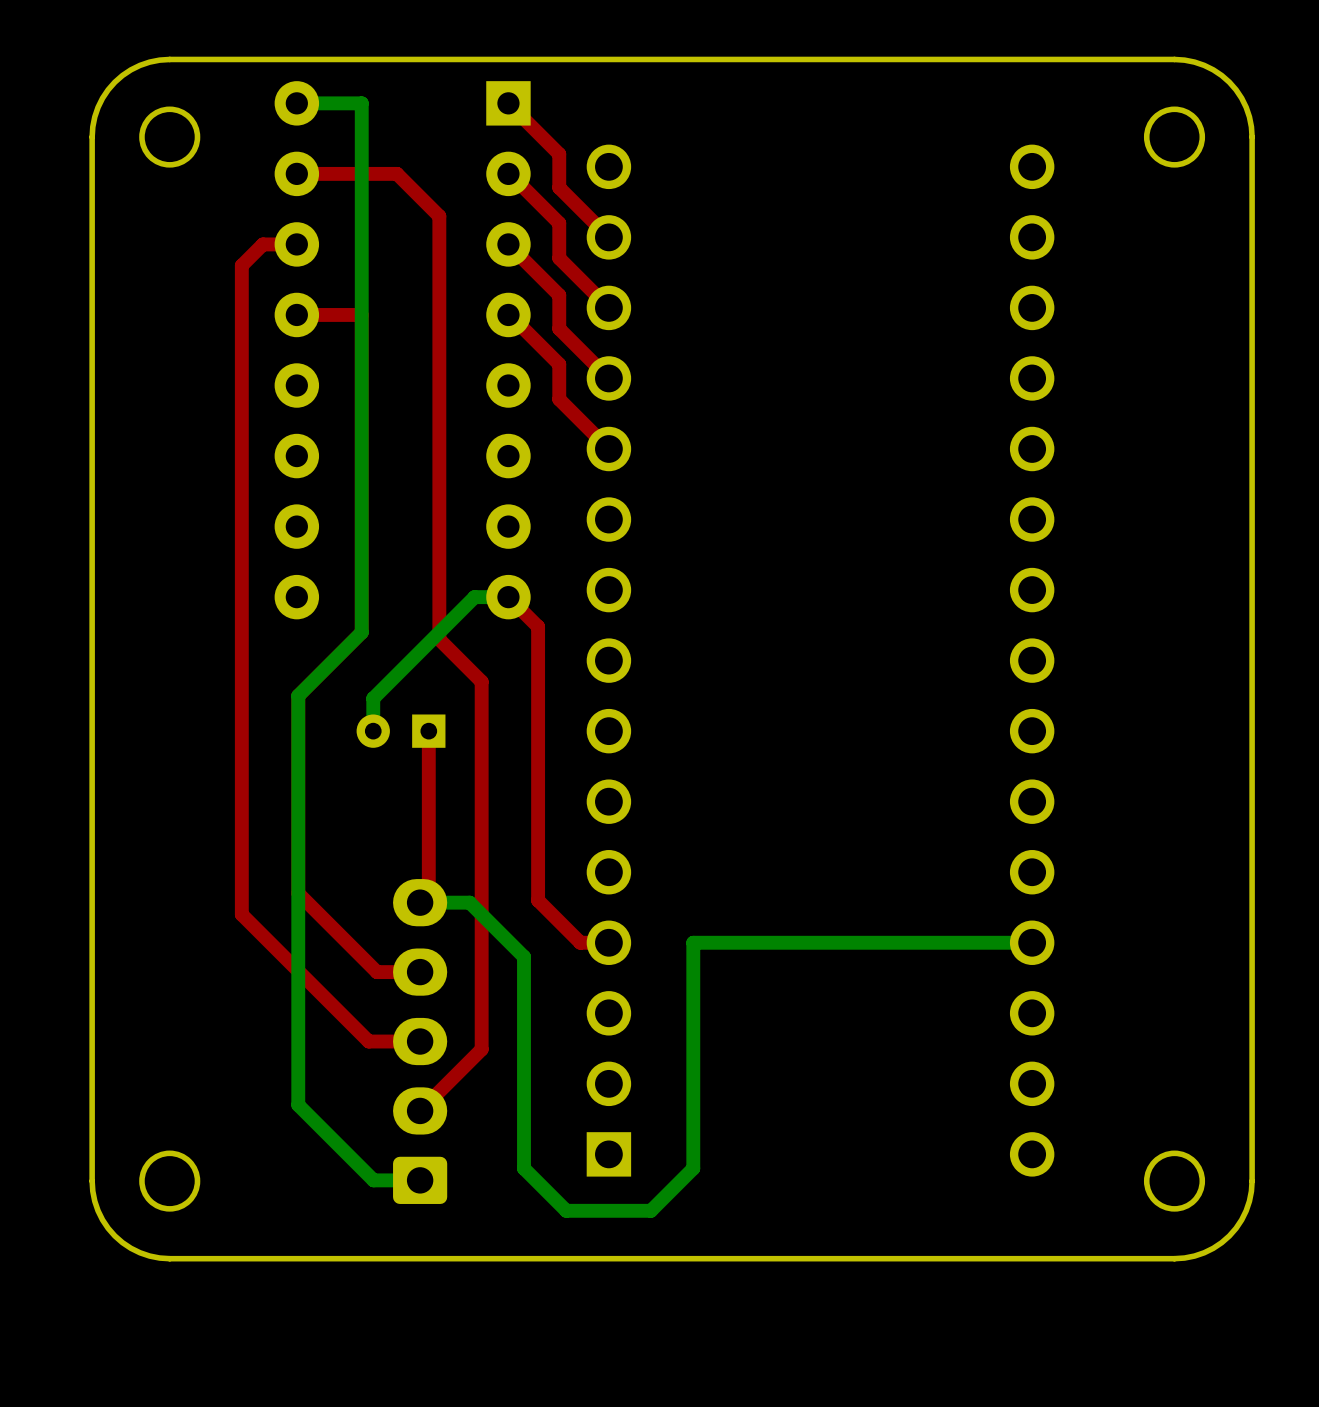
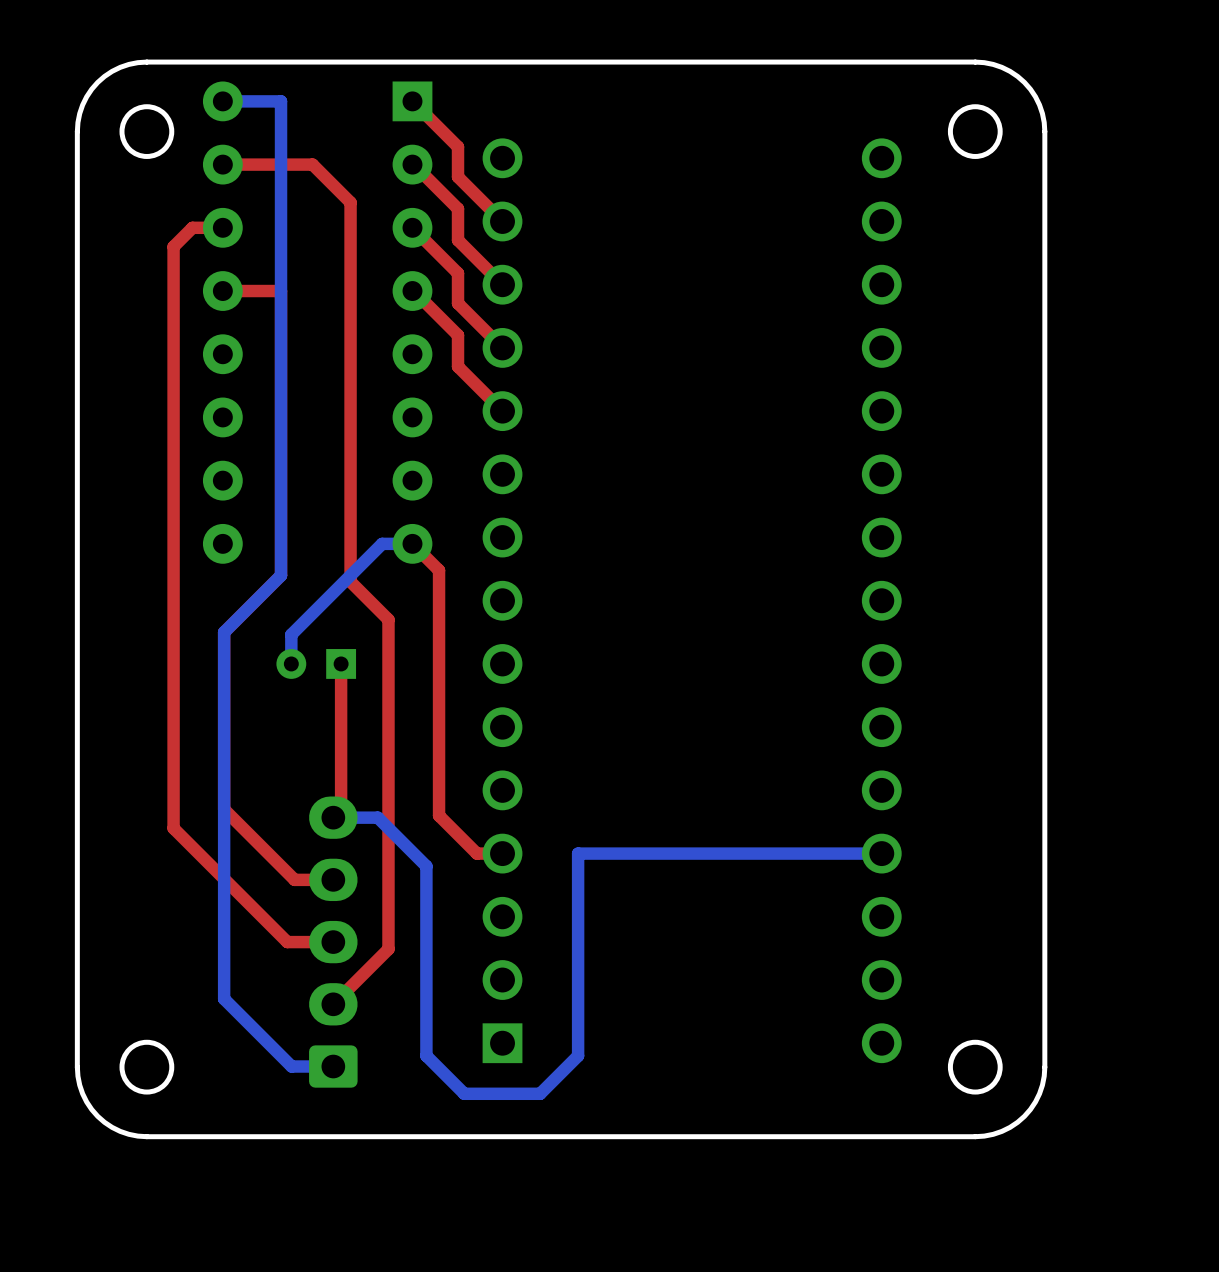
board edge: (212, 59) (159, 60) (130, 69) (114, 82) (102, 98) (94, 116) (92, 137) (92, 1191) (102, 1219) (114, 1235) (130, 1248) (159, 1258) (212, 1258) -> (146, 62) (120, 67) (97, 82) (82, 104) (77, 131) (77, 1076) (86, 1101) (97, 1116) (120, 1131) (146, 1136)
board edge: (1136, 59) (1184, 60) (1204, 65) (1221, 75) (1241, 98) (1249, 116) (1252, 137) (1251, 1191) (1241, 1219) (1229, 1235) (1213, 1248) (1184, 1258) (1136, 1258) -> (975, 62) (1001, 67) (1024, 82) (1039, 104) (1044, 131) (1044, 1076) (1035, 1101) (1024, 1116) (1001, 1131) (975, 1136)
round board edge position: (169, 137) -> (146, 131)
round board edge position: (1174, 137) -> (975, 131)
round board edge position: (169, 1181) -> (146, 1067)
round board edge position: (1174, 1181) -> (975, 1067)

